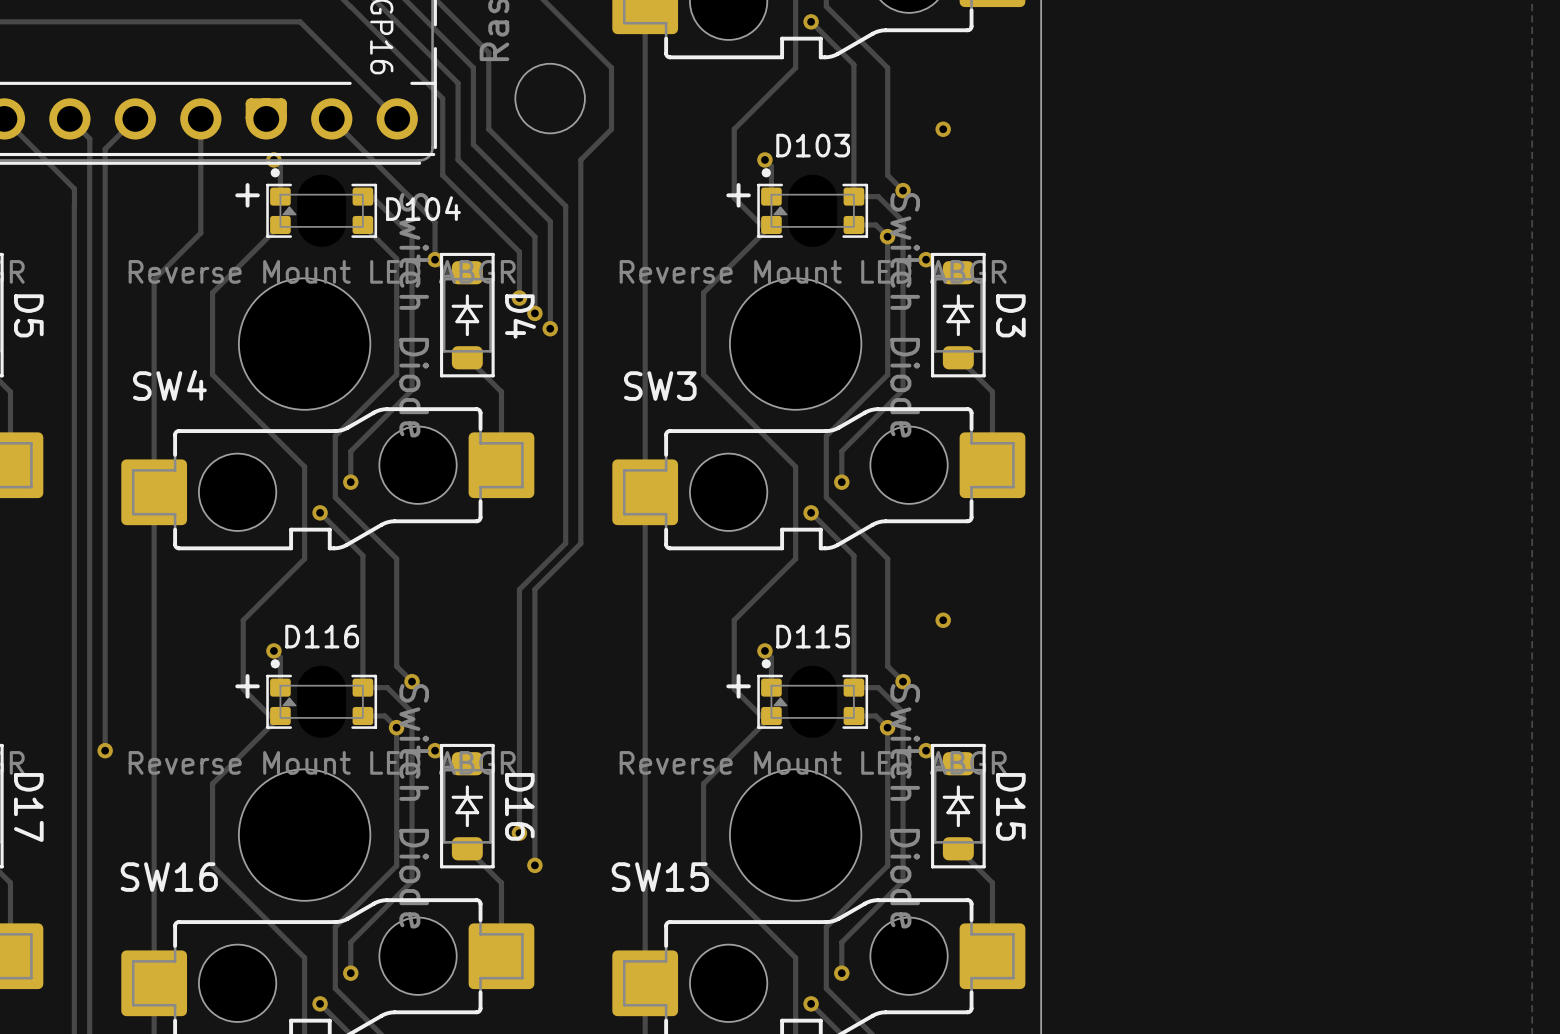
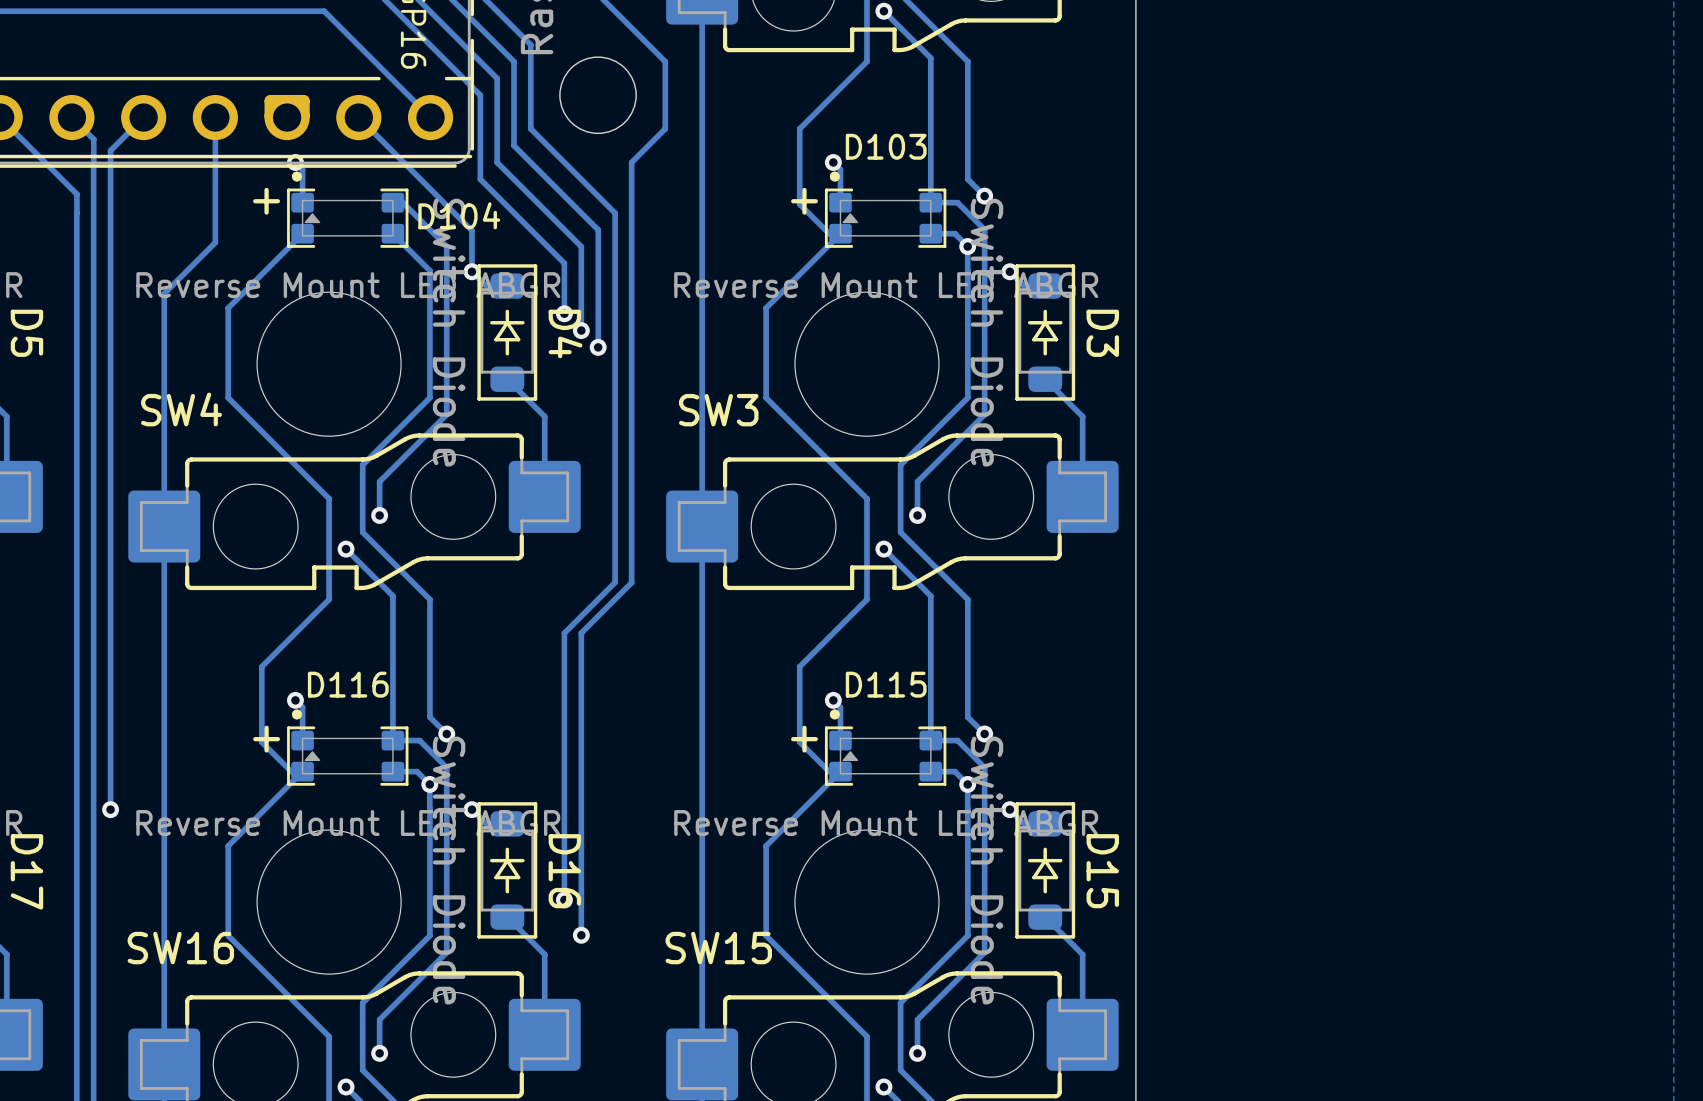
via: (943, 129) -> none
via: (943, 620) -> none

